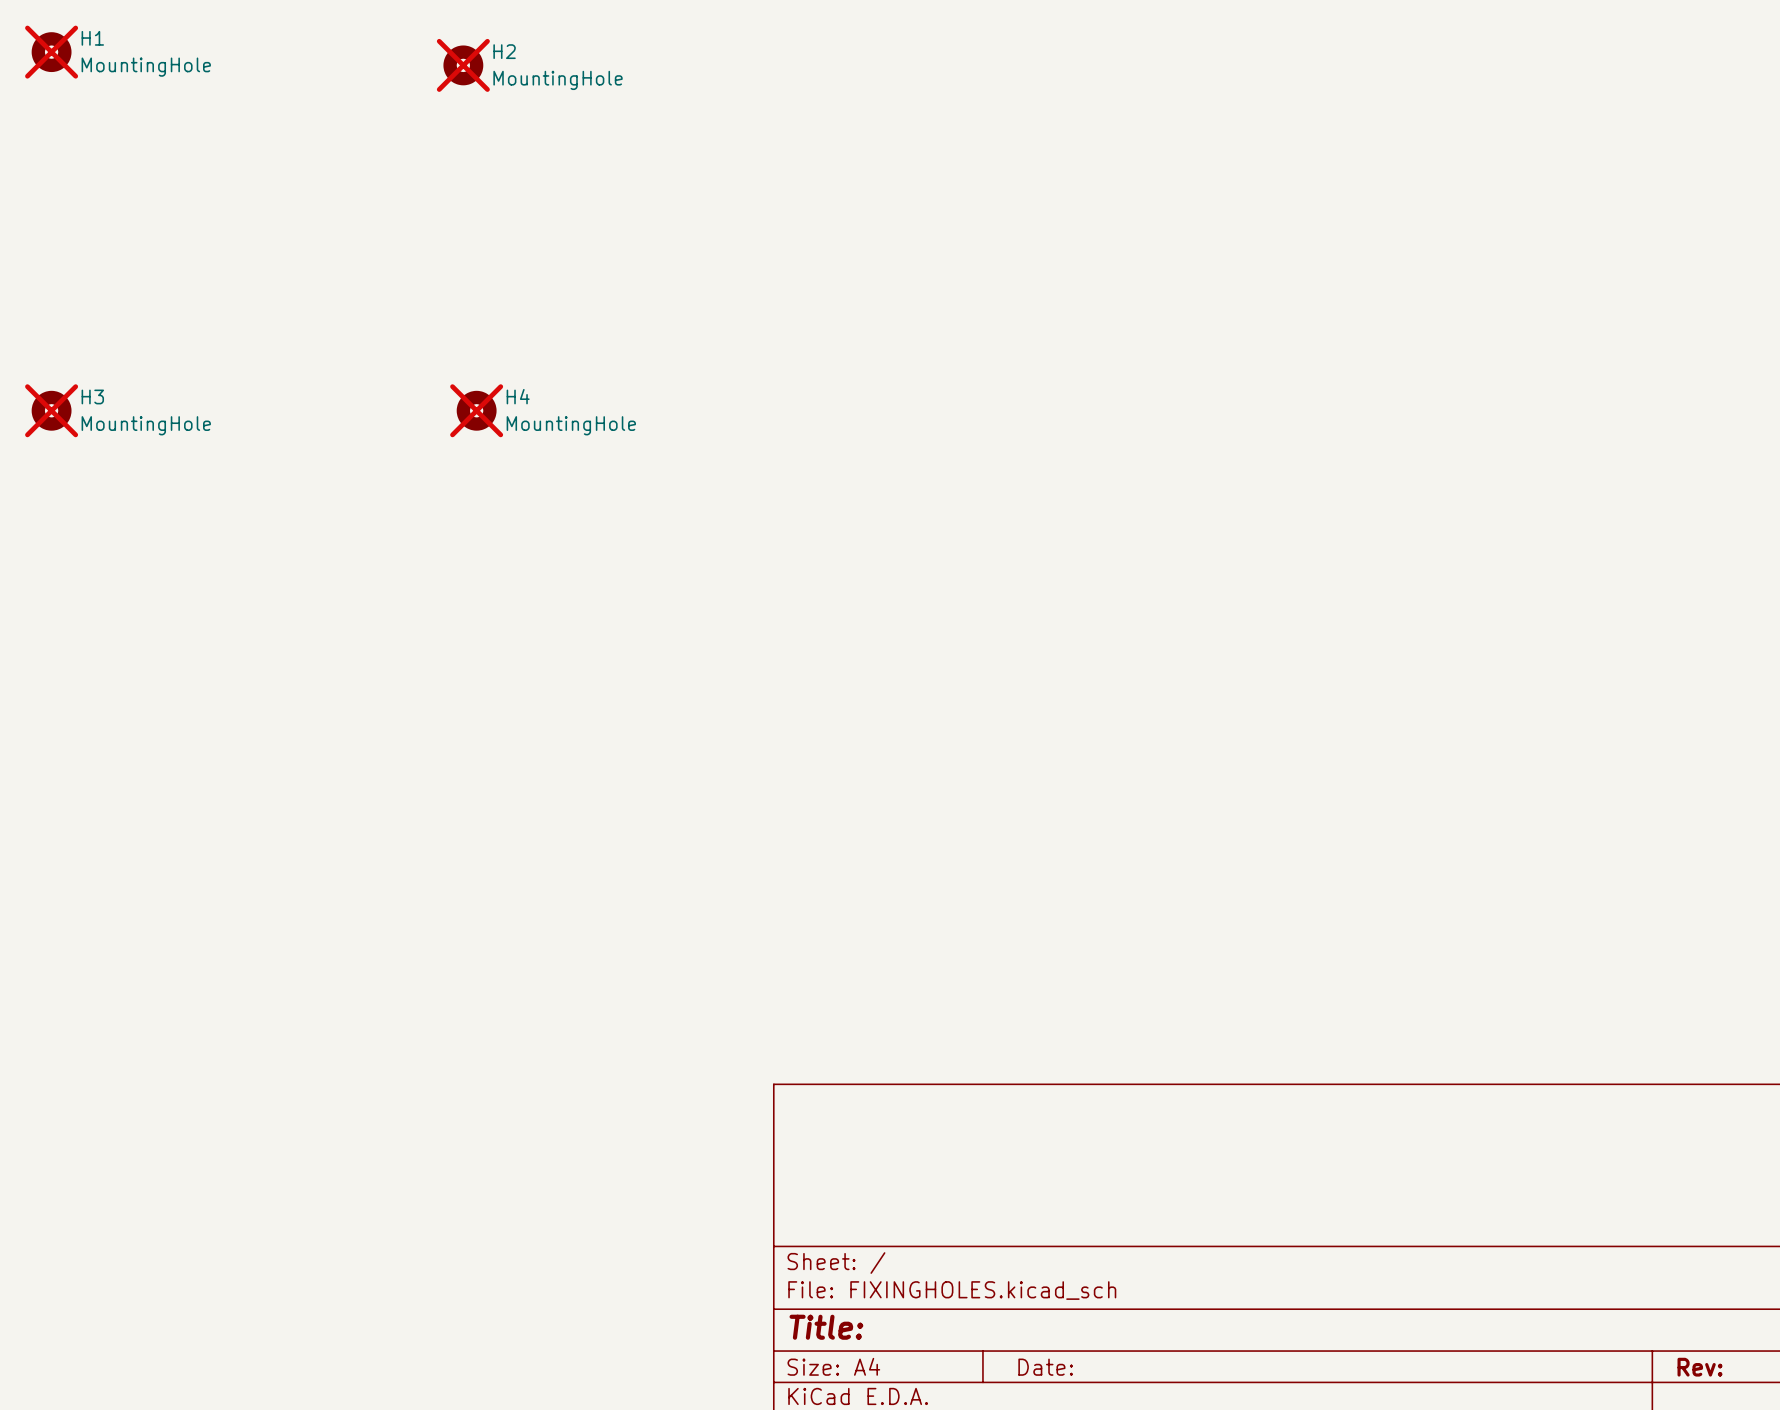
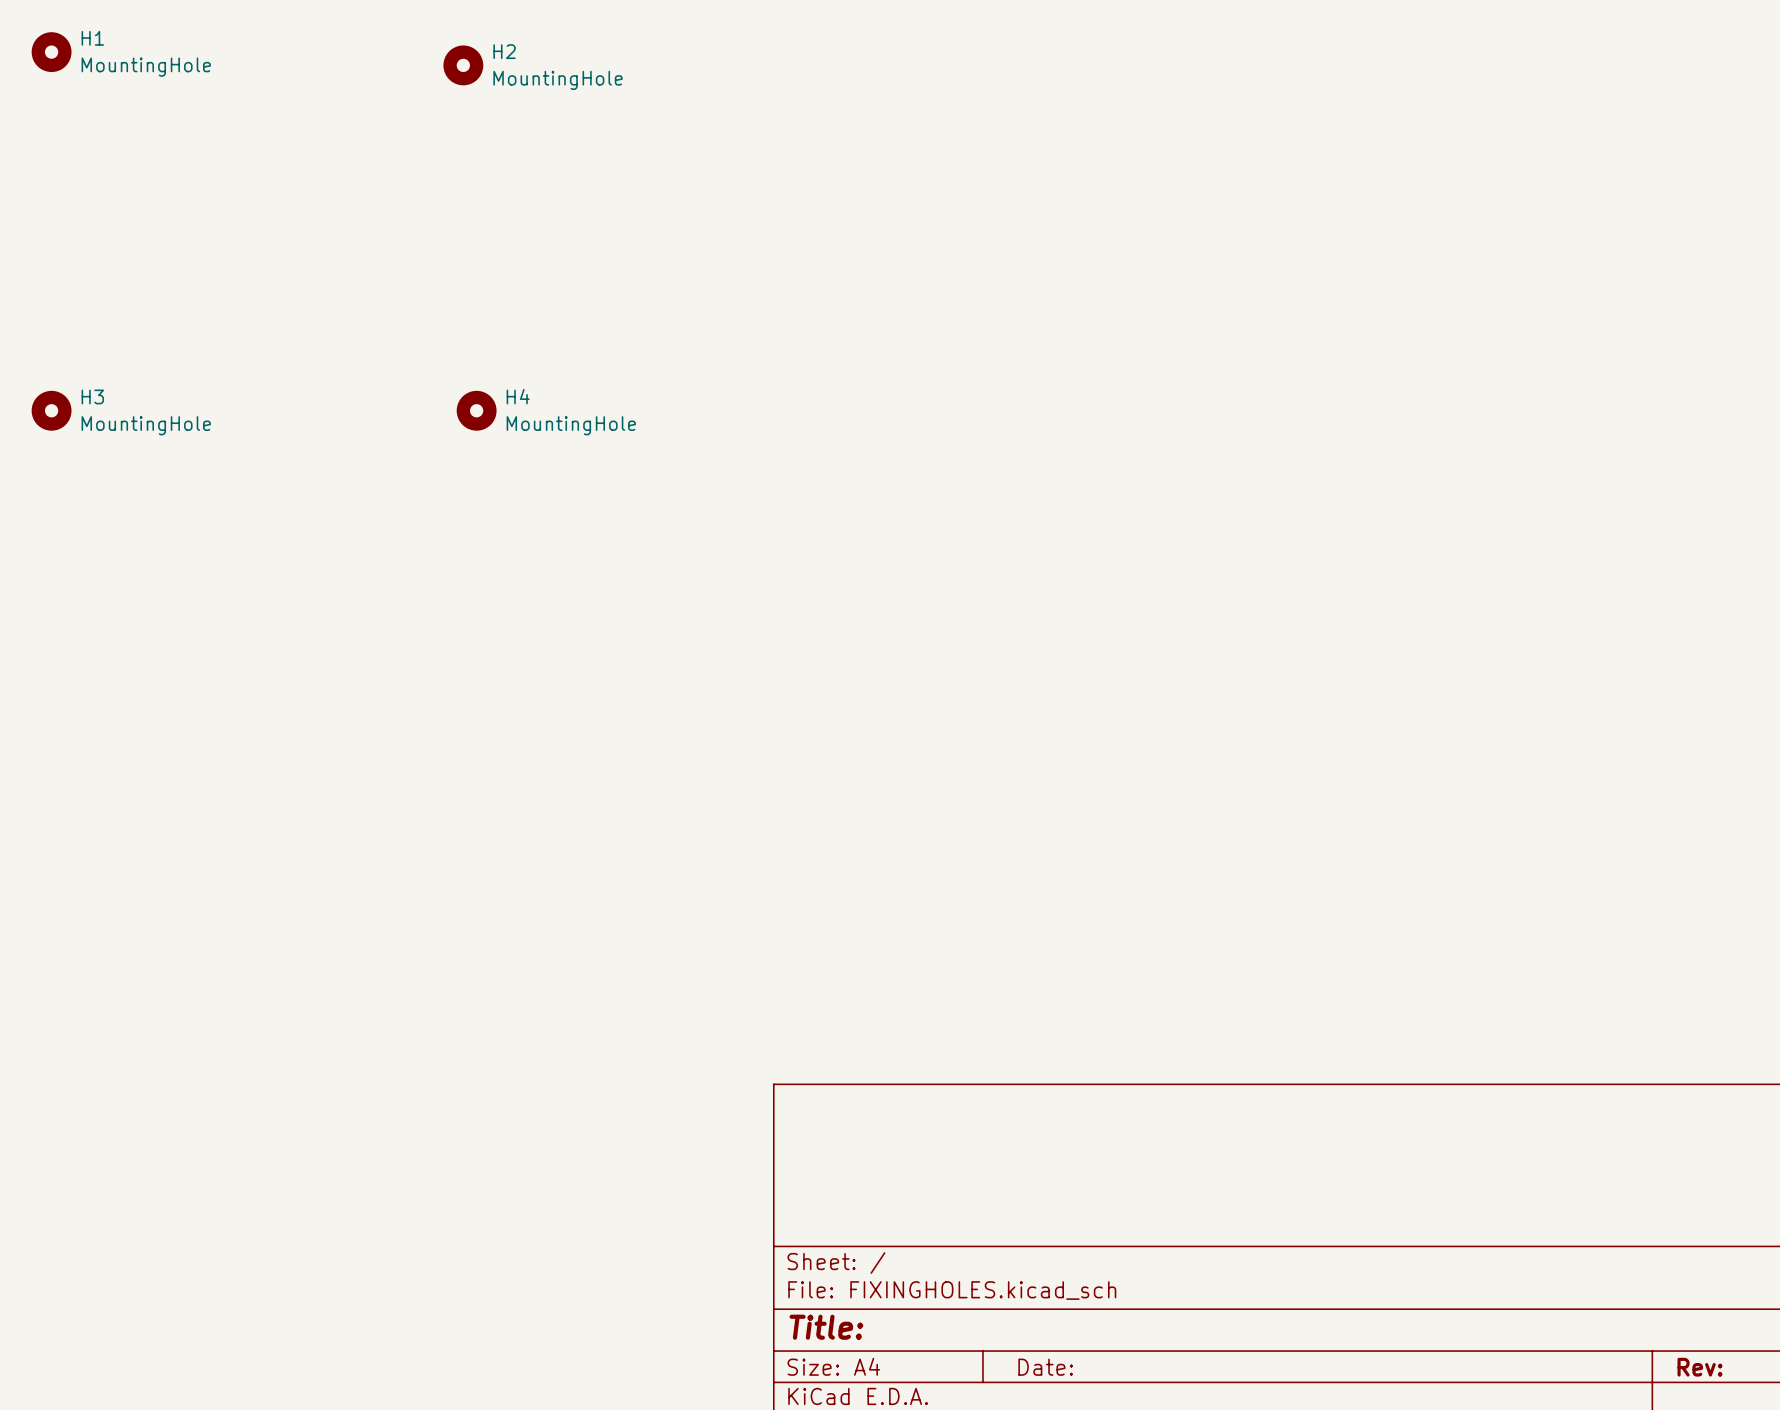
H1 do-not-place cross: (51, 52) -> none
H2 do-not-place cross: (463, 65) -> none
H3 do-not-place cross: (51, 410) -> none
H4 do-not-place cross: (476, 410) -> none

